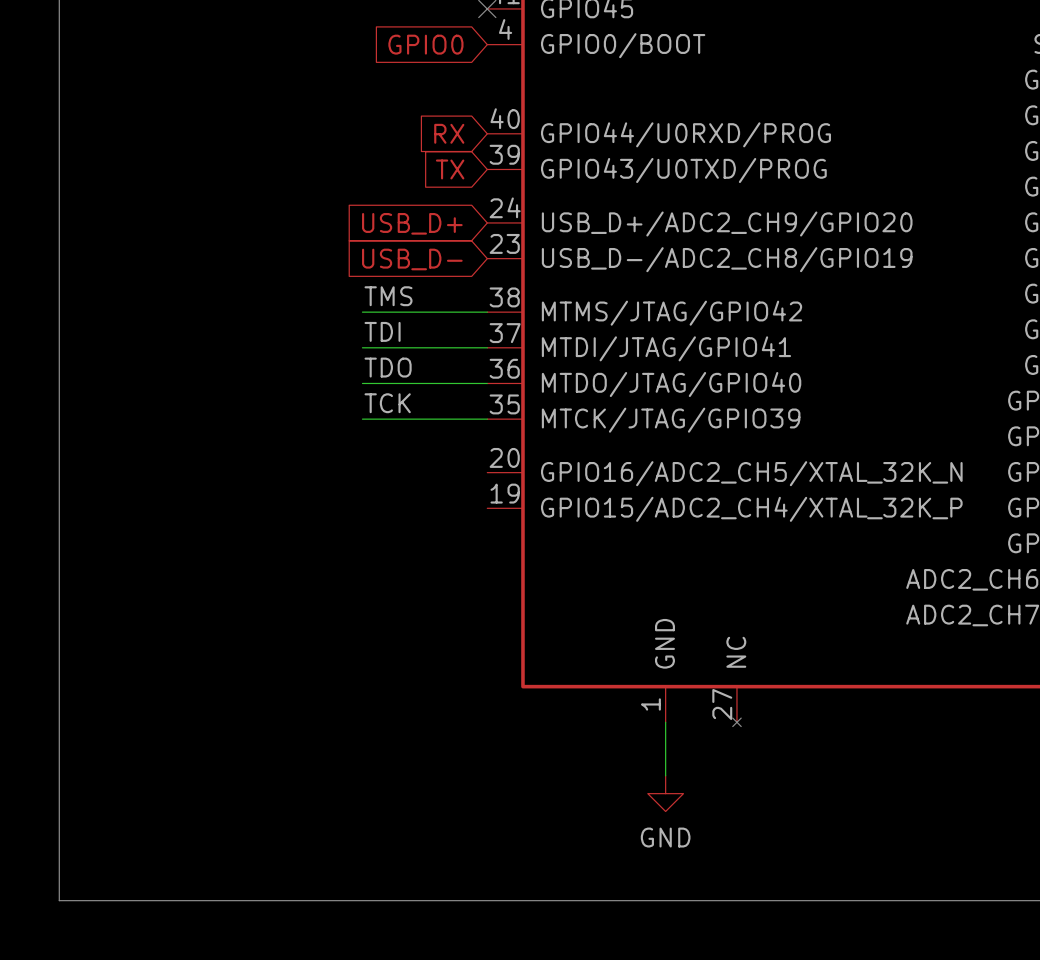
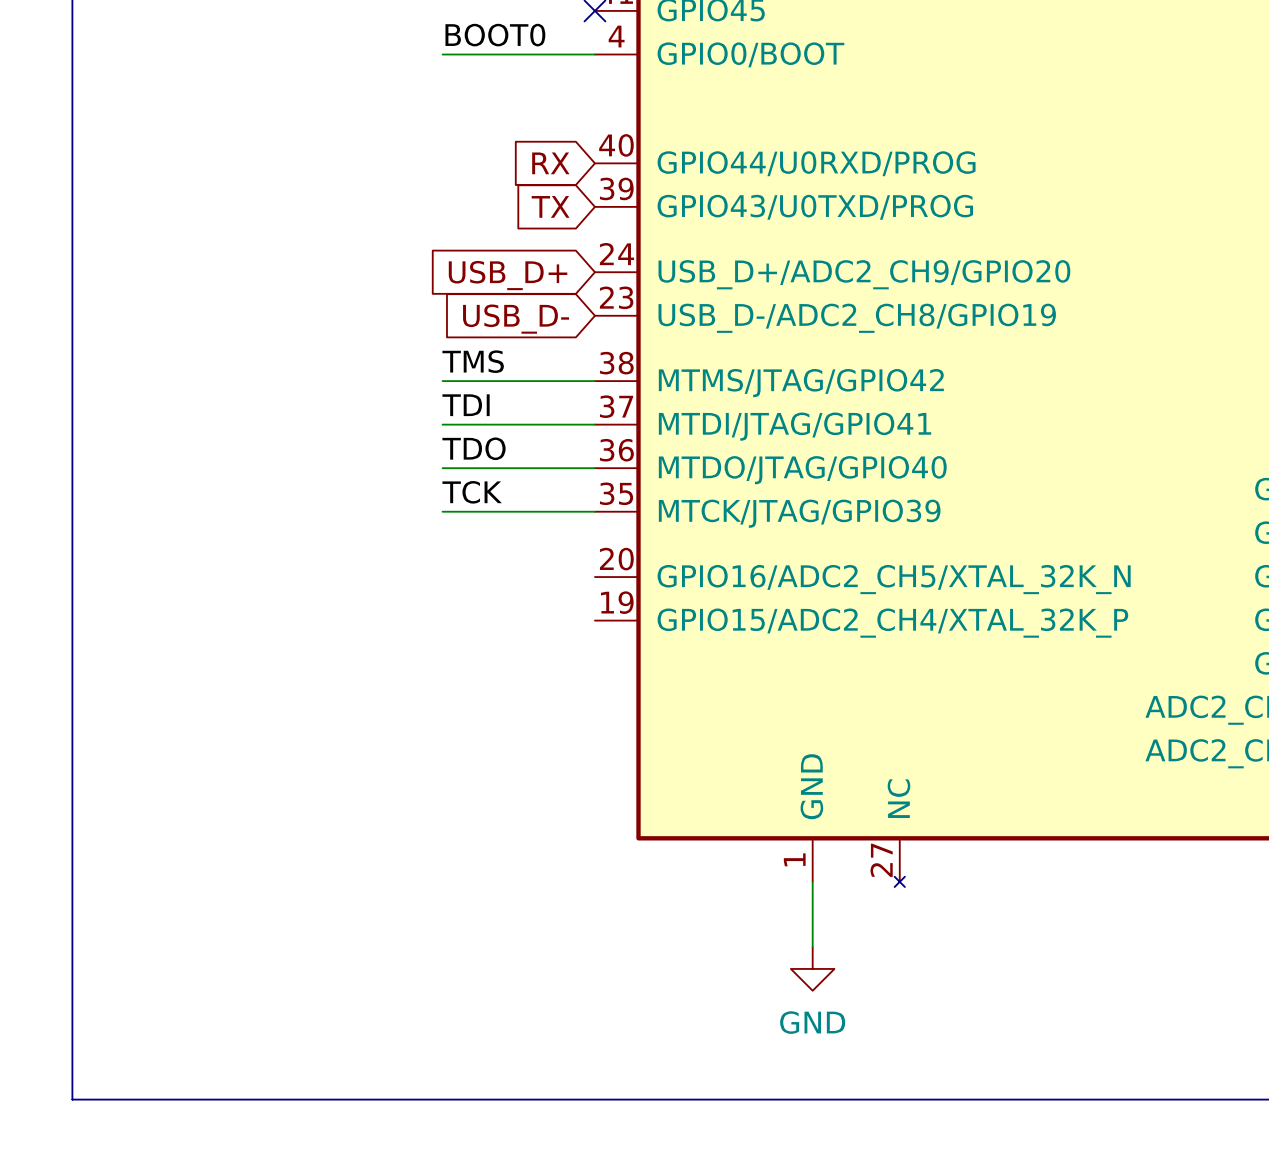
label: none -> BOOT0 (495, 35)
wire: none -> (442, 54) (594, 54)
global label: GPIO0 (425, 44) -> none

